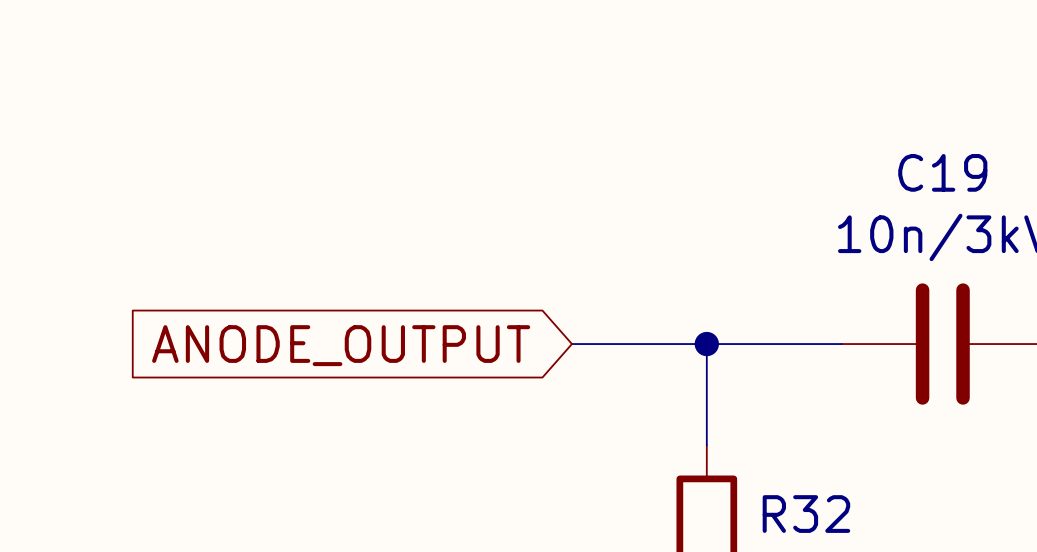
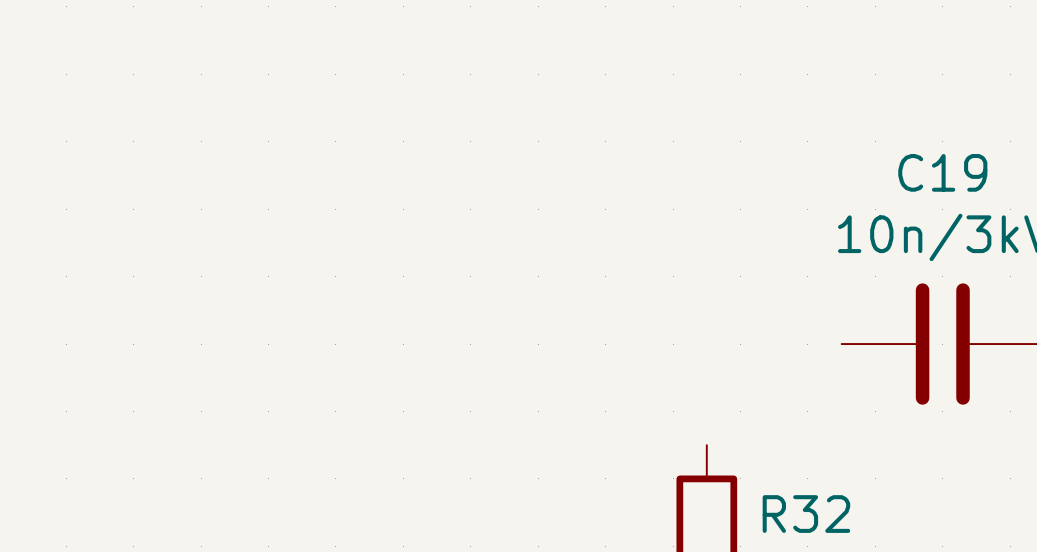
wire: (571, 344) (841, 344) -> none
wire: (706, 344) (706, 445) -> none
junction: (706, 344) -> none
global label: ANODE_OUTPUT (341, 345) -> none

